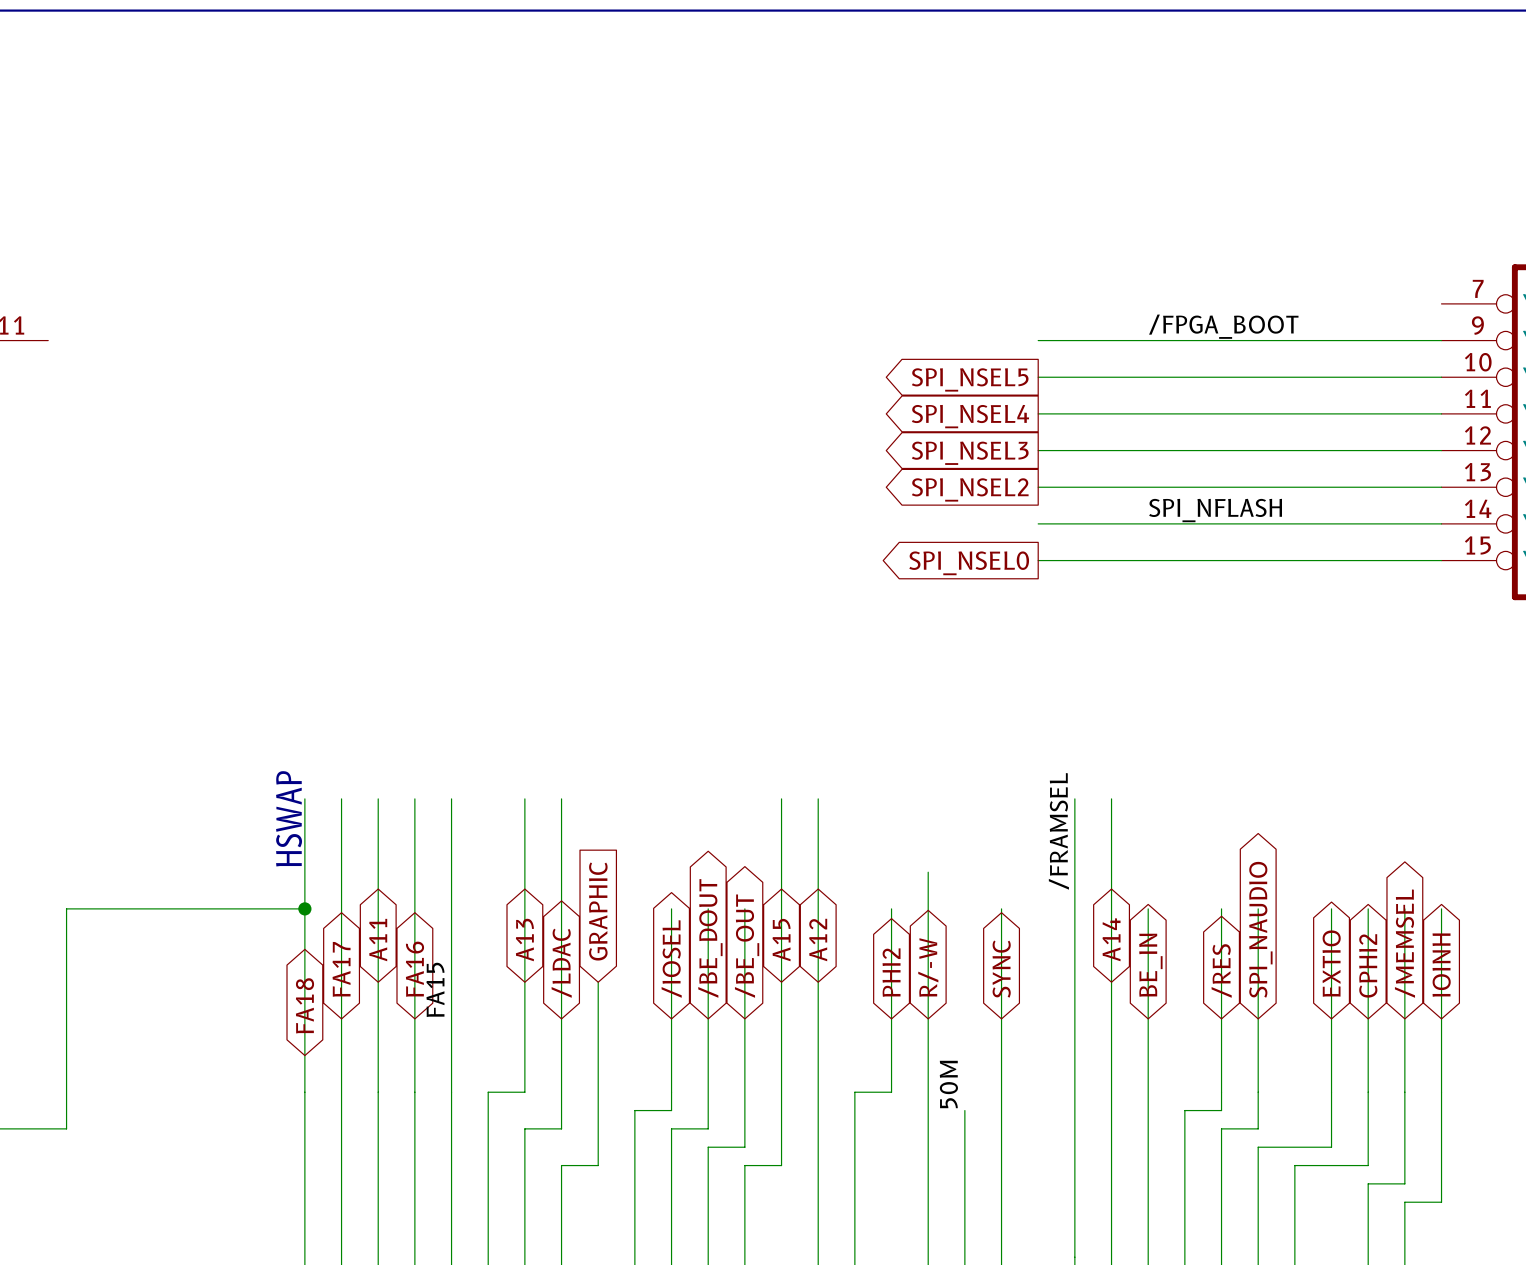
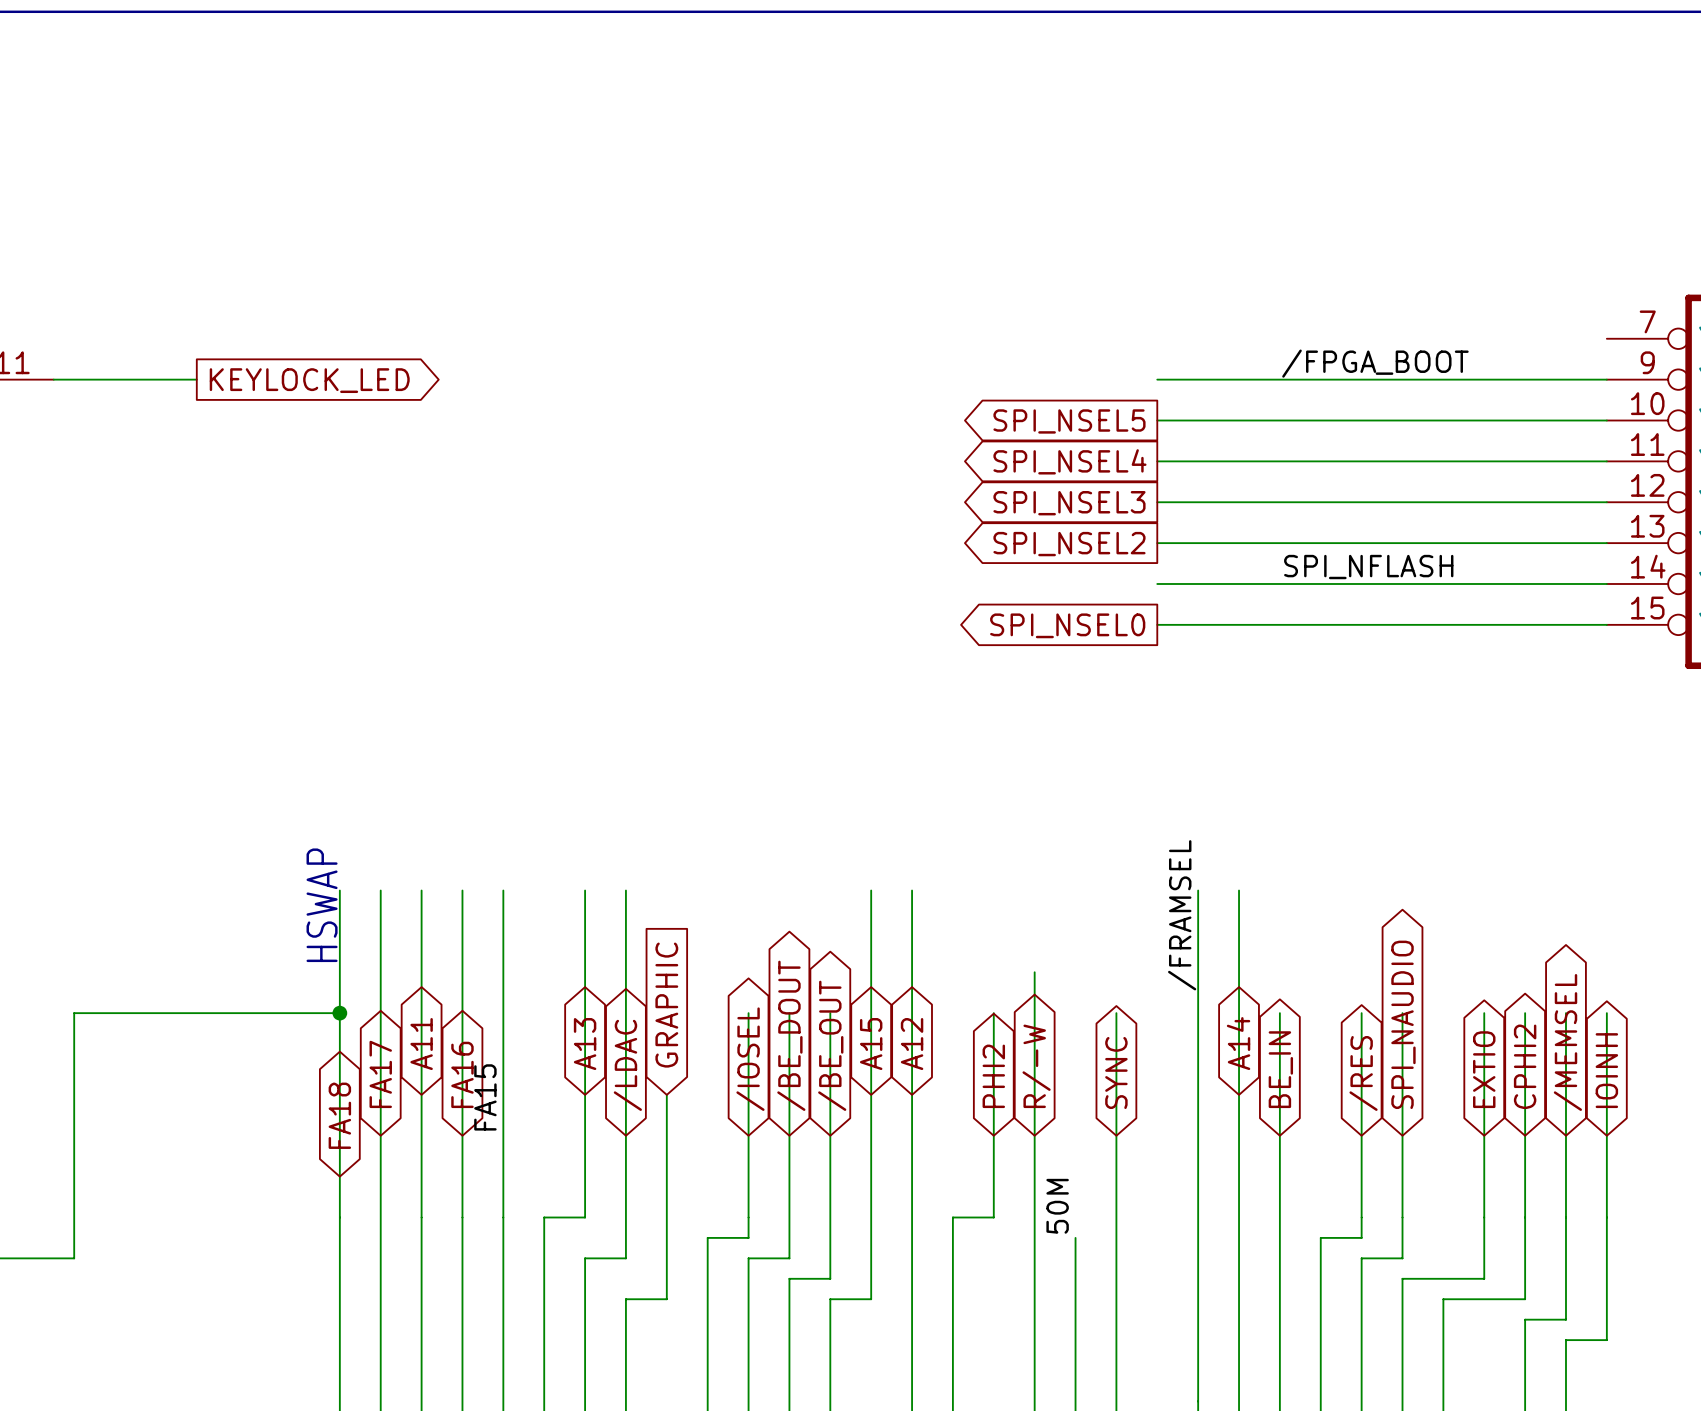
wire: none -> (53, 379) (196, 379)
global label: none -> KEYLOCK_LED (309, 380)

